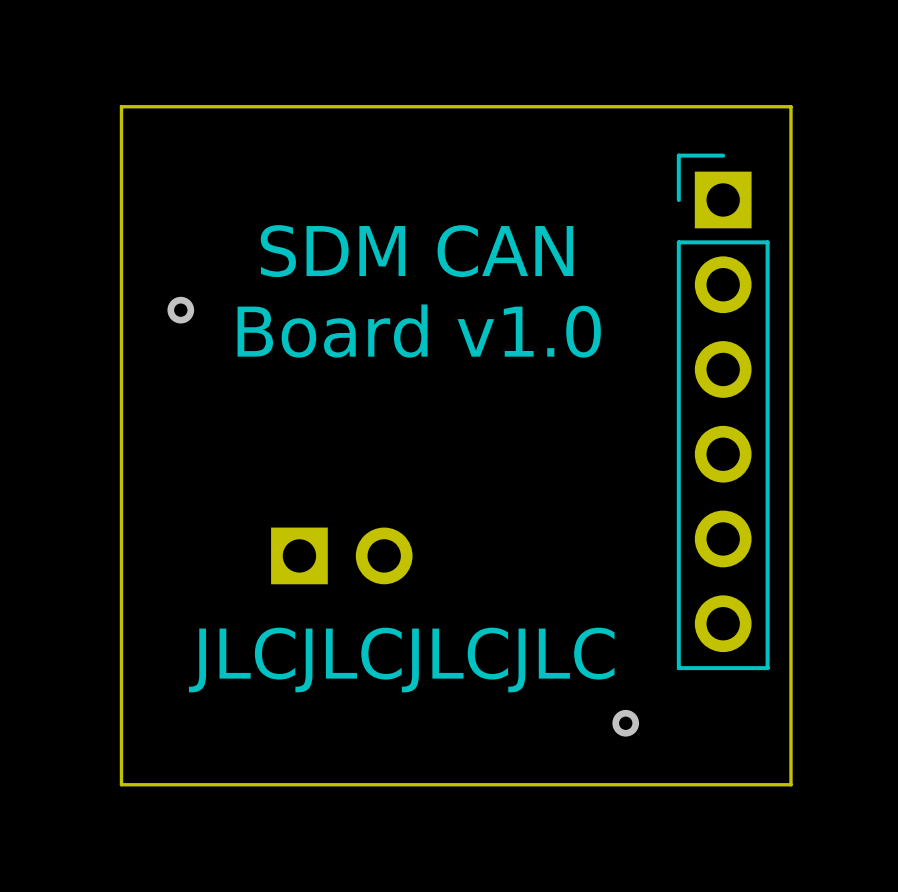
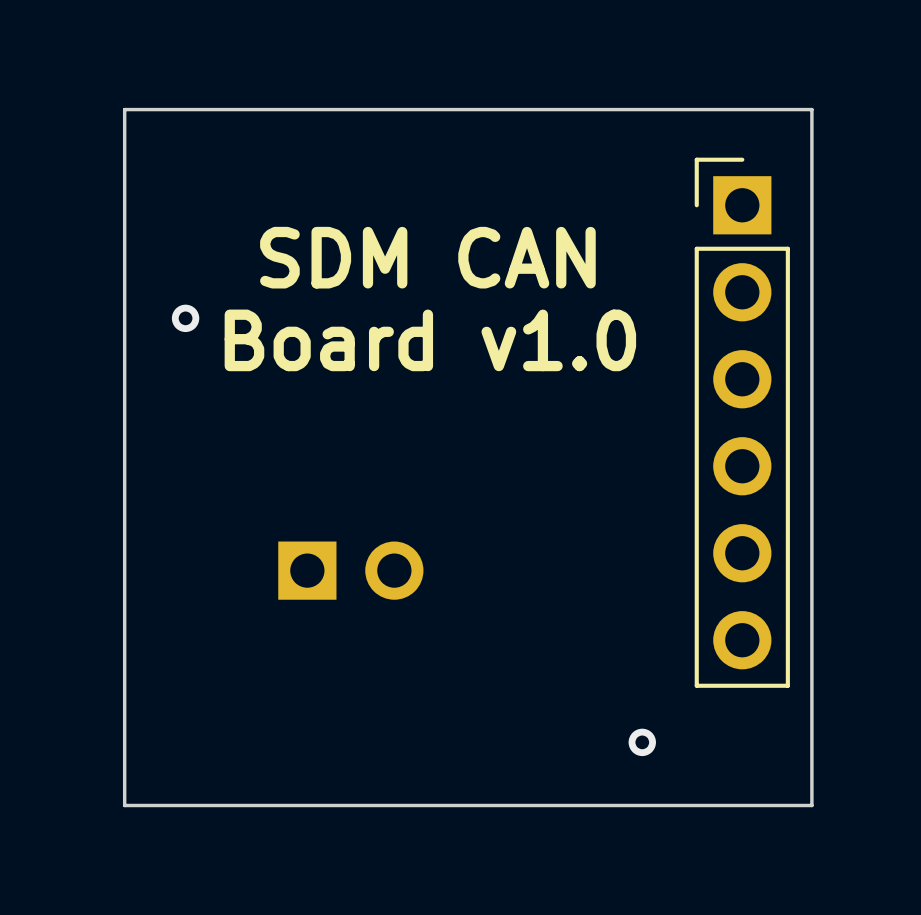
text: JLCJLCJLCJLC (401, 660) -> none

